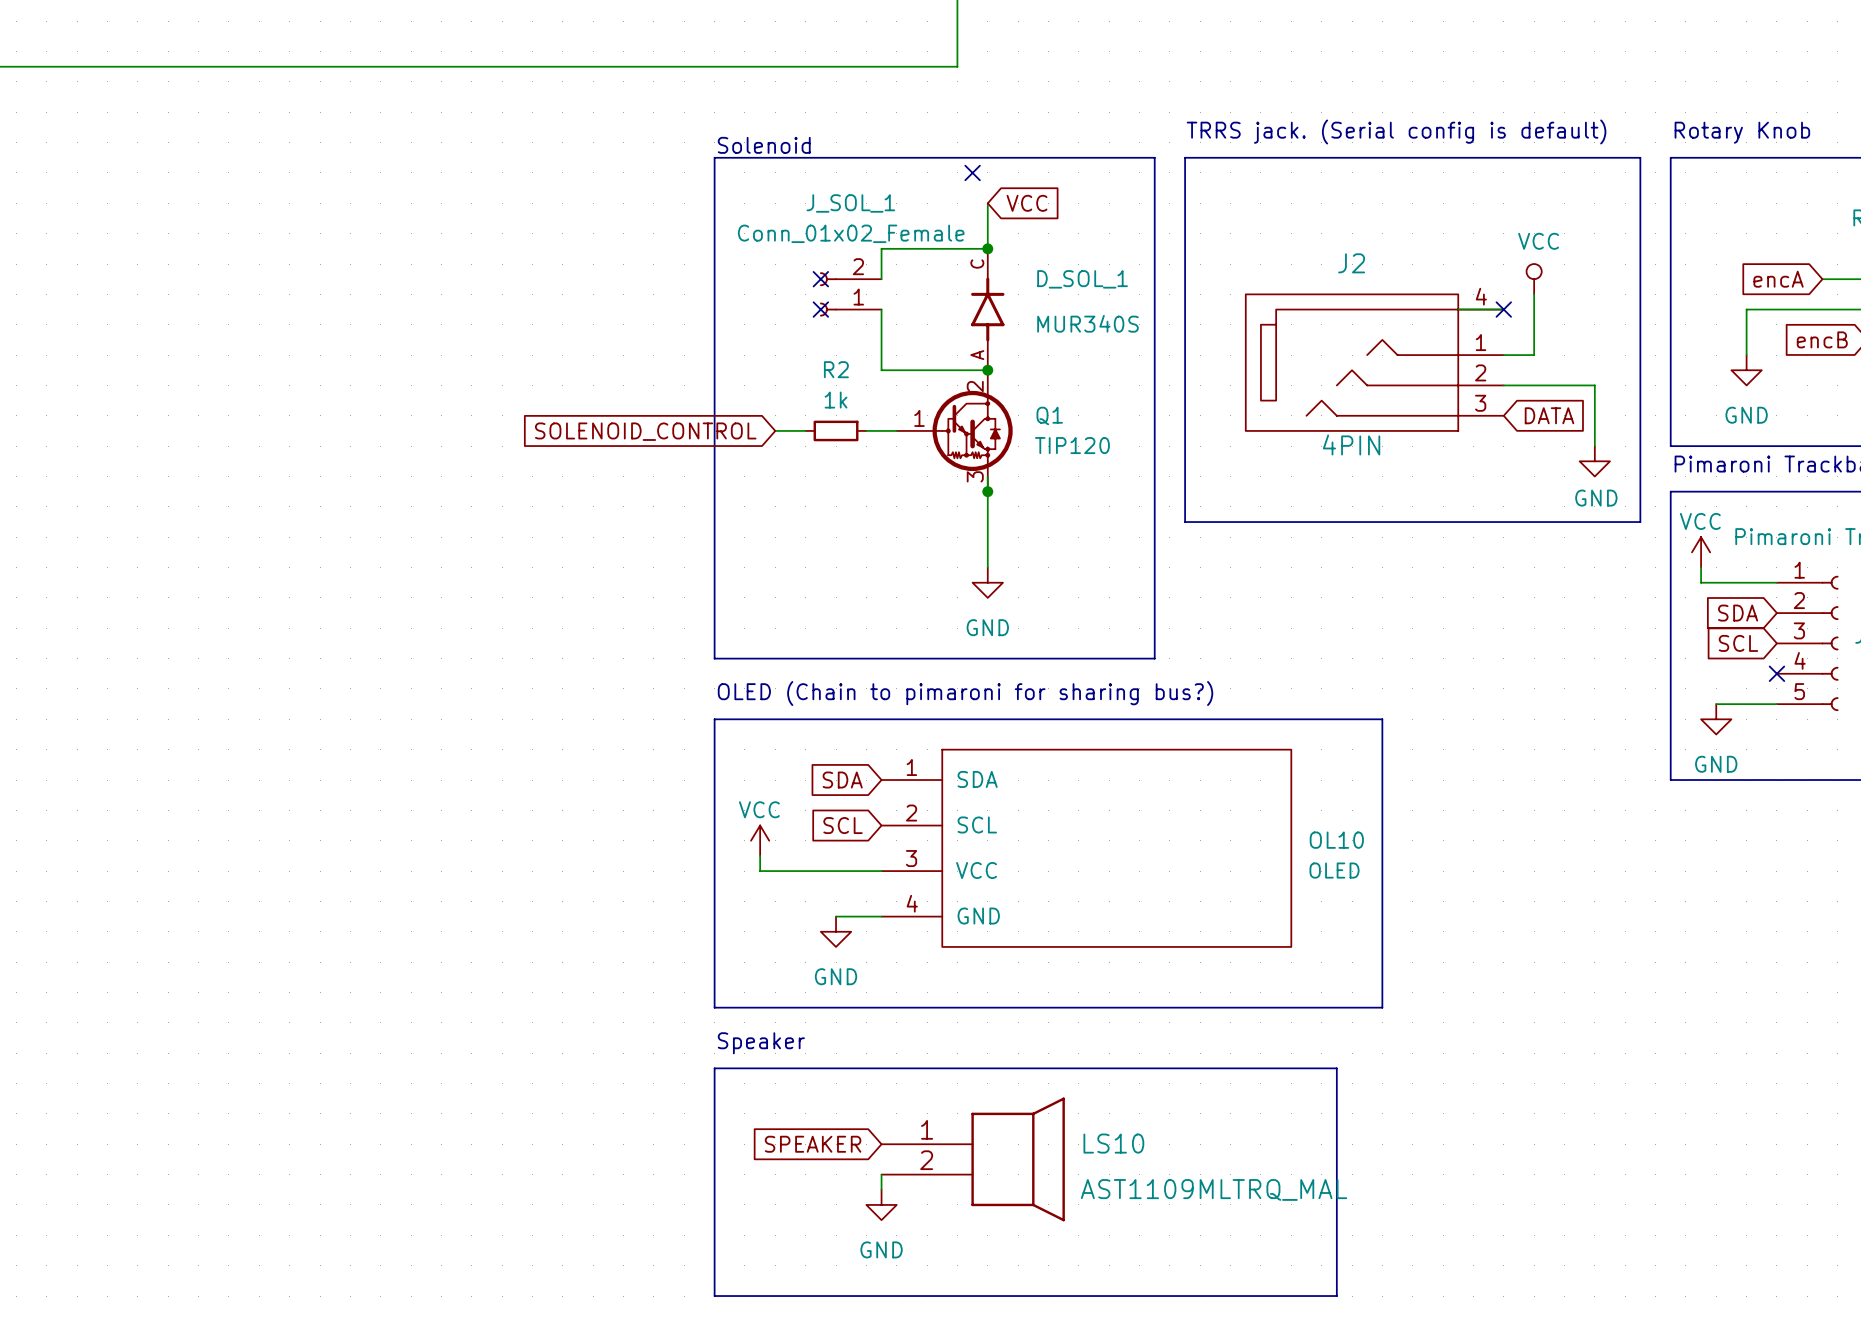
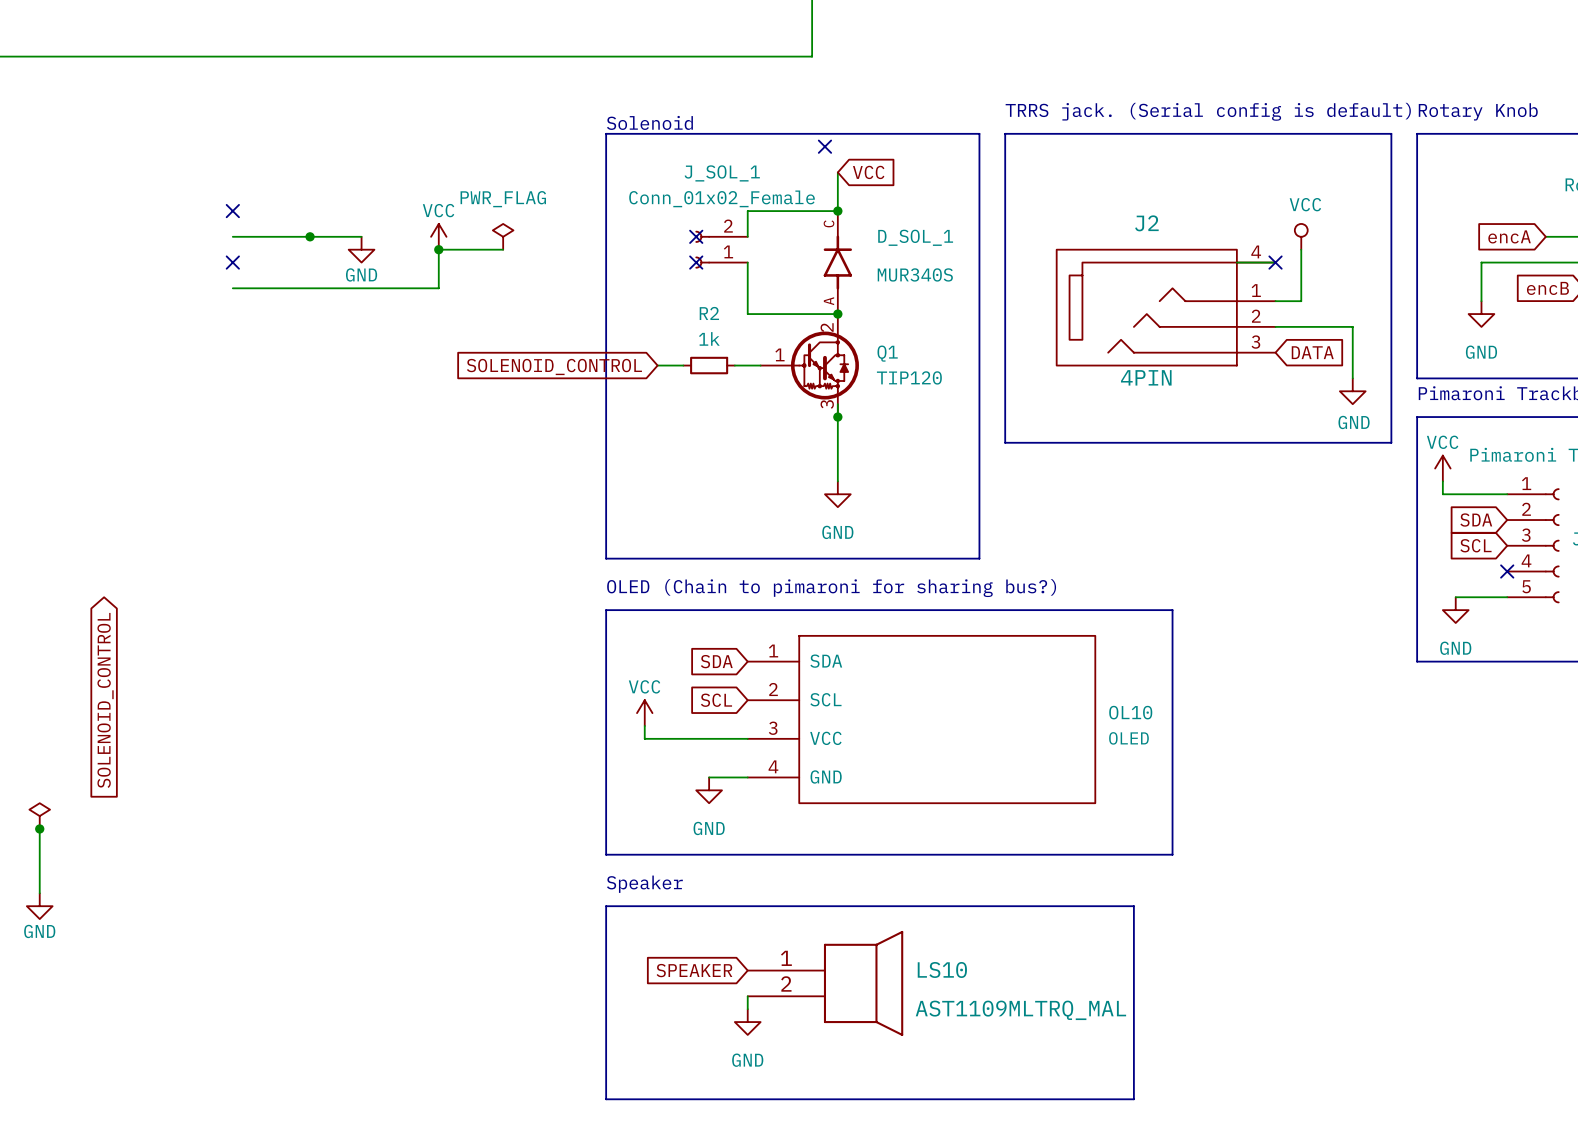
no-connect mark: none -> (232, 211)
wire: none -> (232, 236) (361, 236)
junction: none -> (310, 236)
power symbol: none -> VCC (438, 236)
power symbol: none -> PWR_FLAG (503, 236)
power symbol: none -> GND (361, 249)
junction: none -> (438, 249)
wire: none -> (503, 249) (438, 249) (438, 288) (232, 288)
no-connect mark: none -> (232, 262)
global label: none -> SOLENOID_CONTROL (105, 700)
power symbol: none -> (39, 816)
wire: none -> (39, 828) (39, 893)
junction: none -> (39, 828)
power symbol: none -> GND (39, 906)

